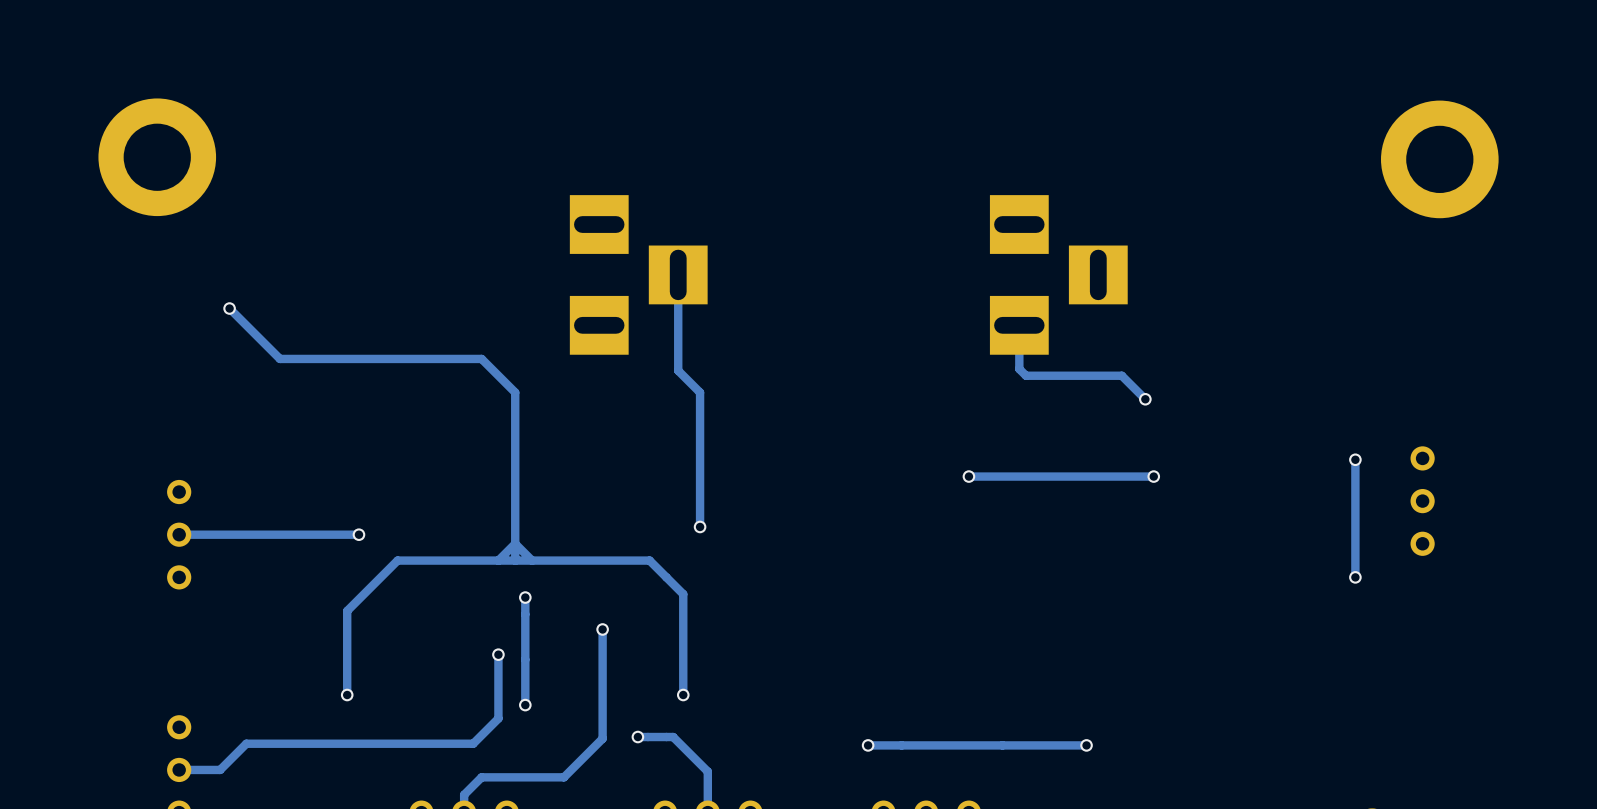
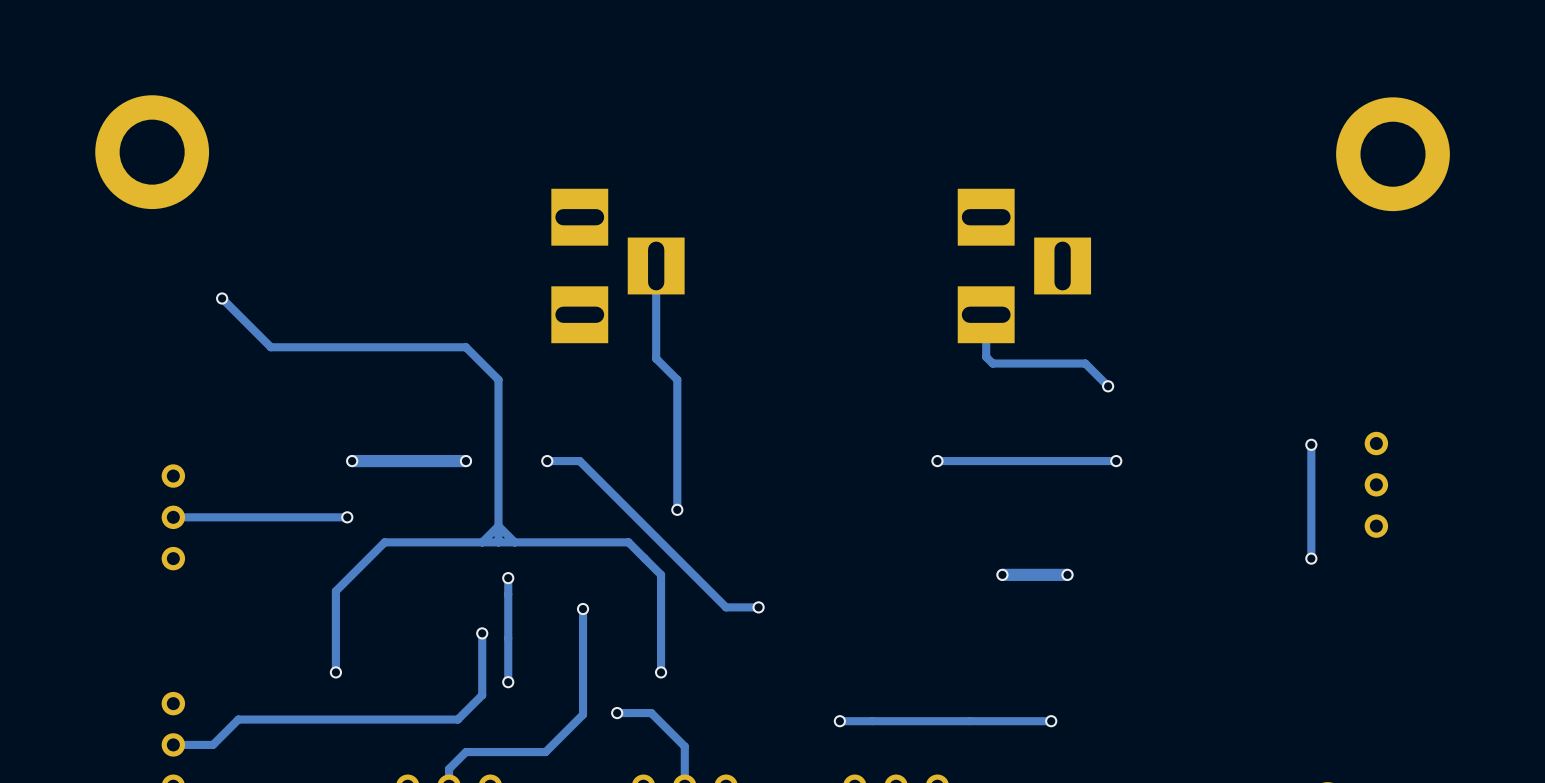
via: none -> (352, 461)
track: none -> (465, 461) (352, 461)
via: none -> (465, 461)
track: none -> (547, 461) (579, 461) (726, 607) (758, 607)
via: none -> (547, 461)
via: none -> (1002, 574)
track: none -> (1067, 574) (1002, 574)
via: none -> (1067, 574)
via: none -> (758, 607)

